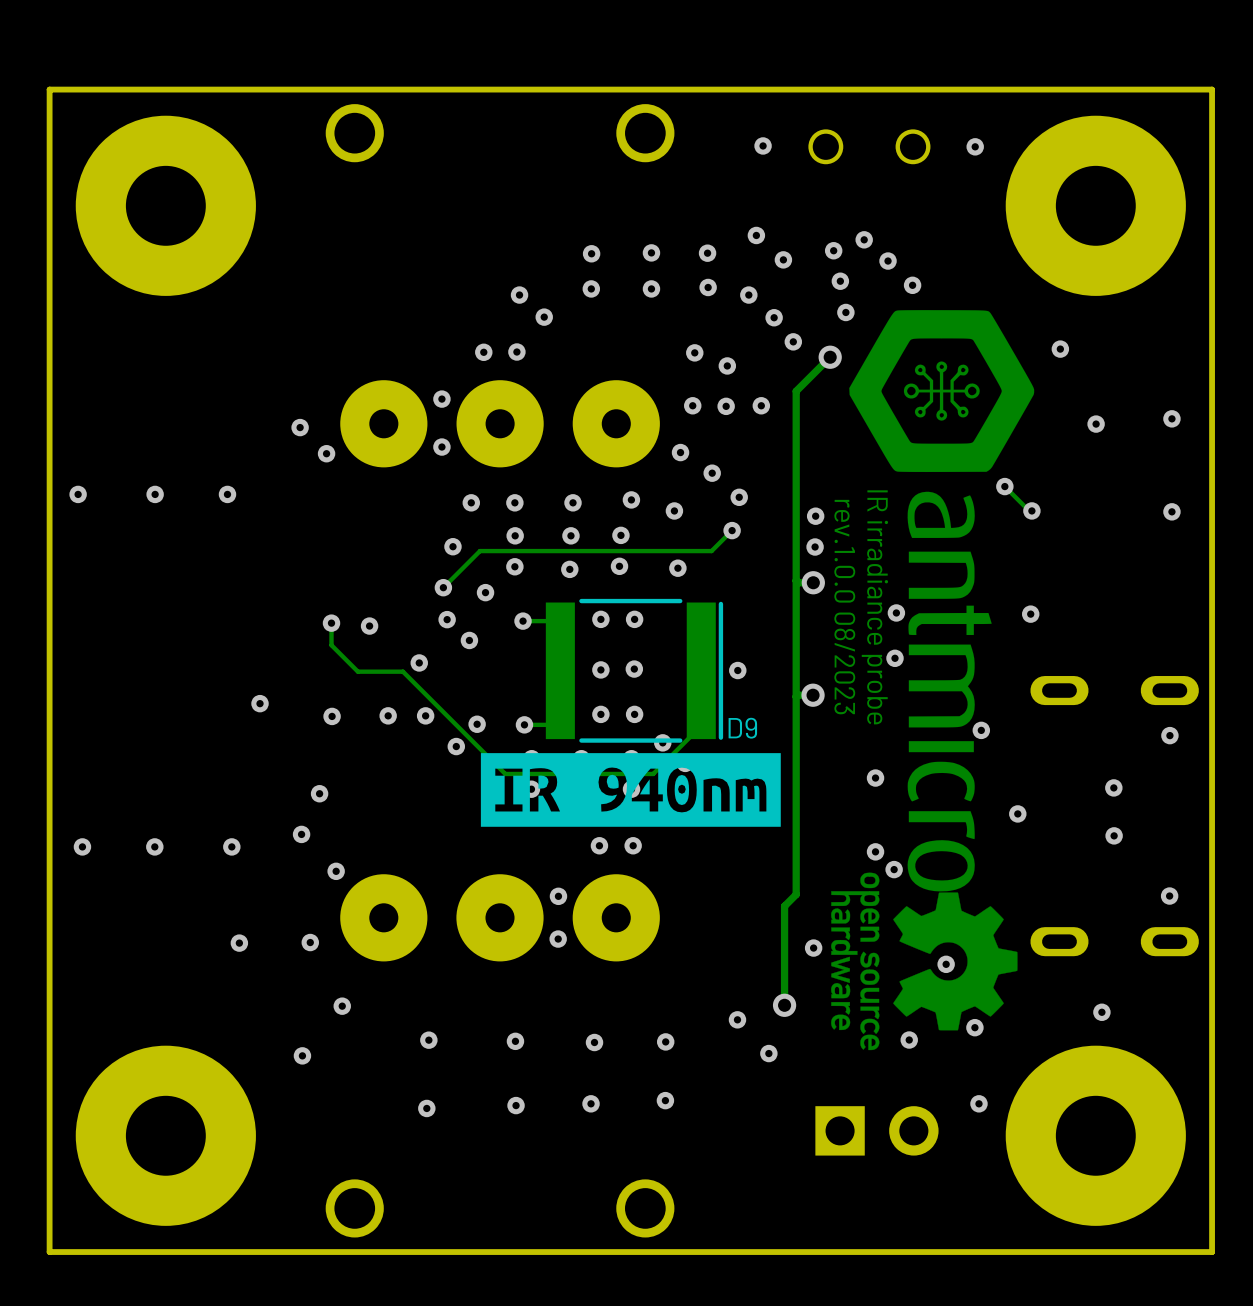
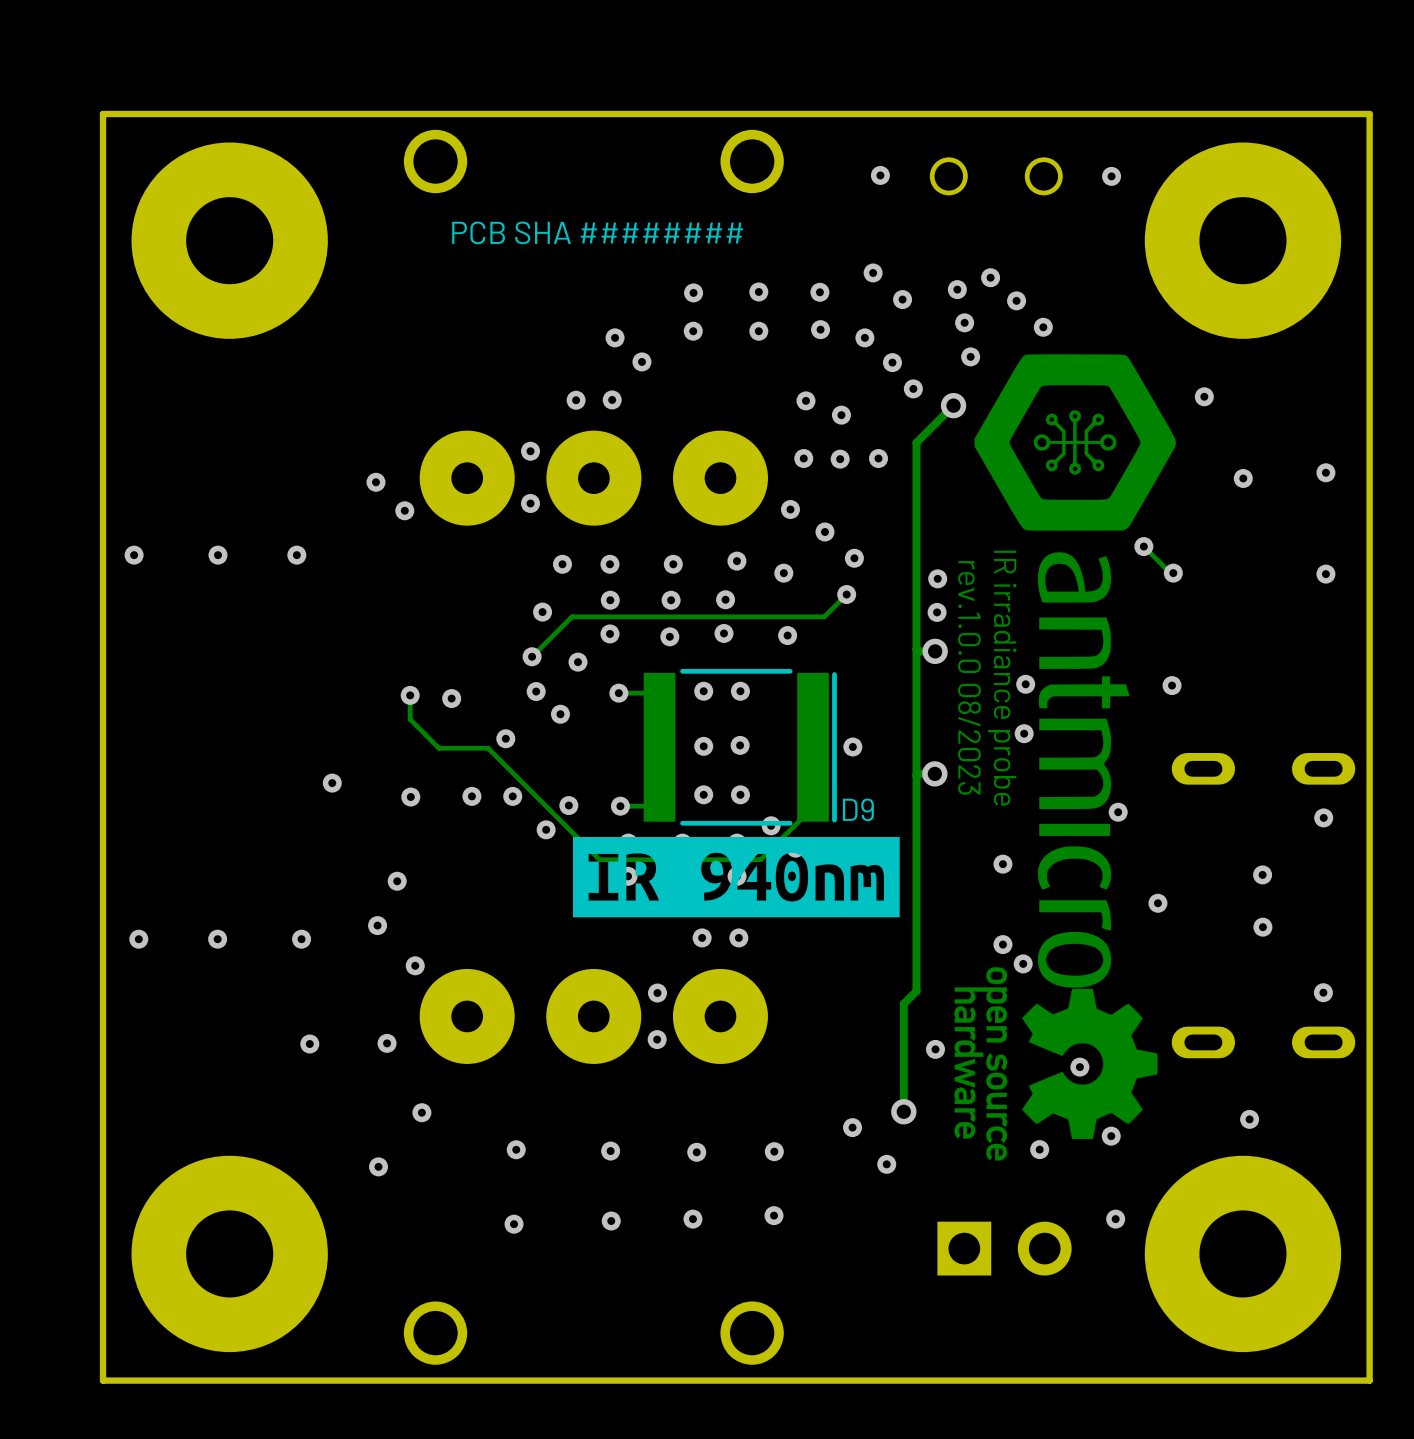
text: none -> PCB SHA ######## (597, 232)

